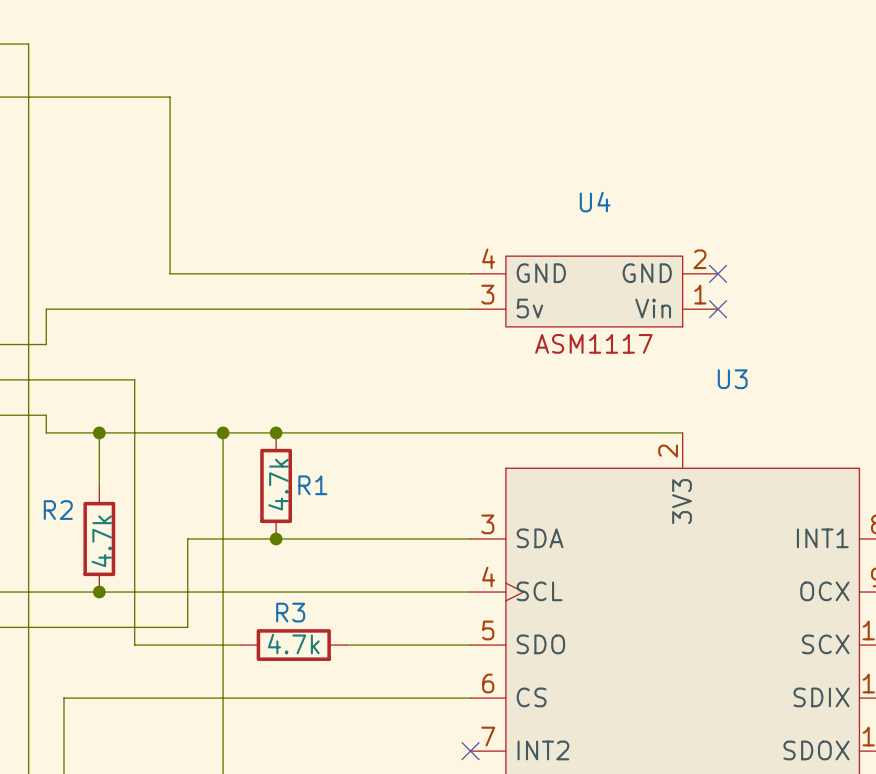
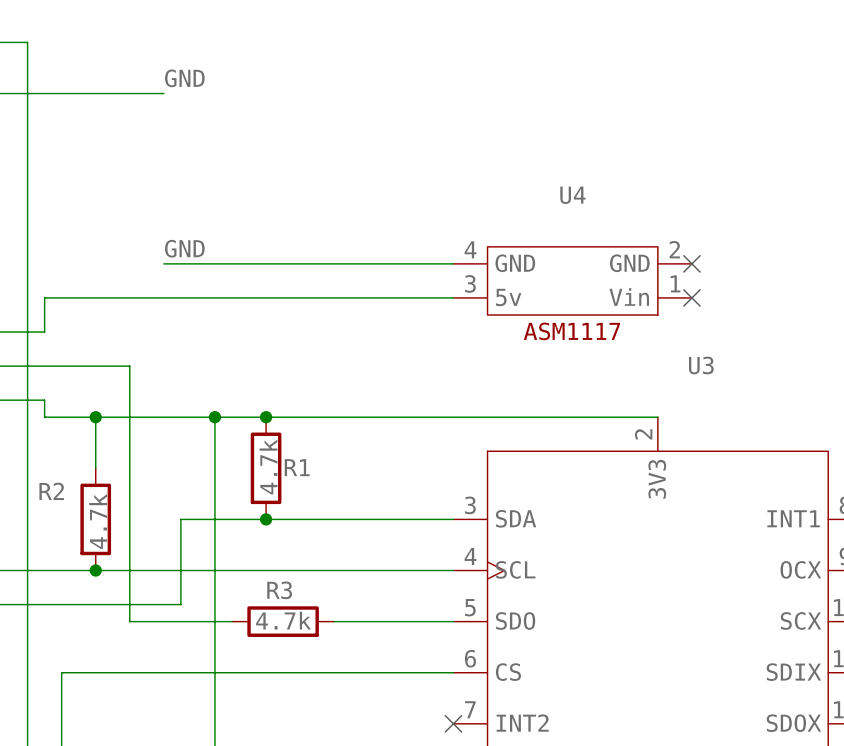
label: none -> GND (184, 78)
wire: (170, 97) (170, 273) -> none
label: none -> GND (184, 248)

